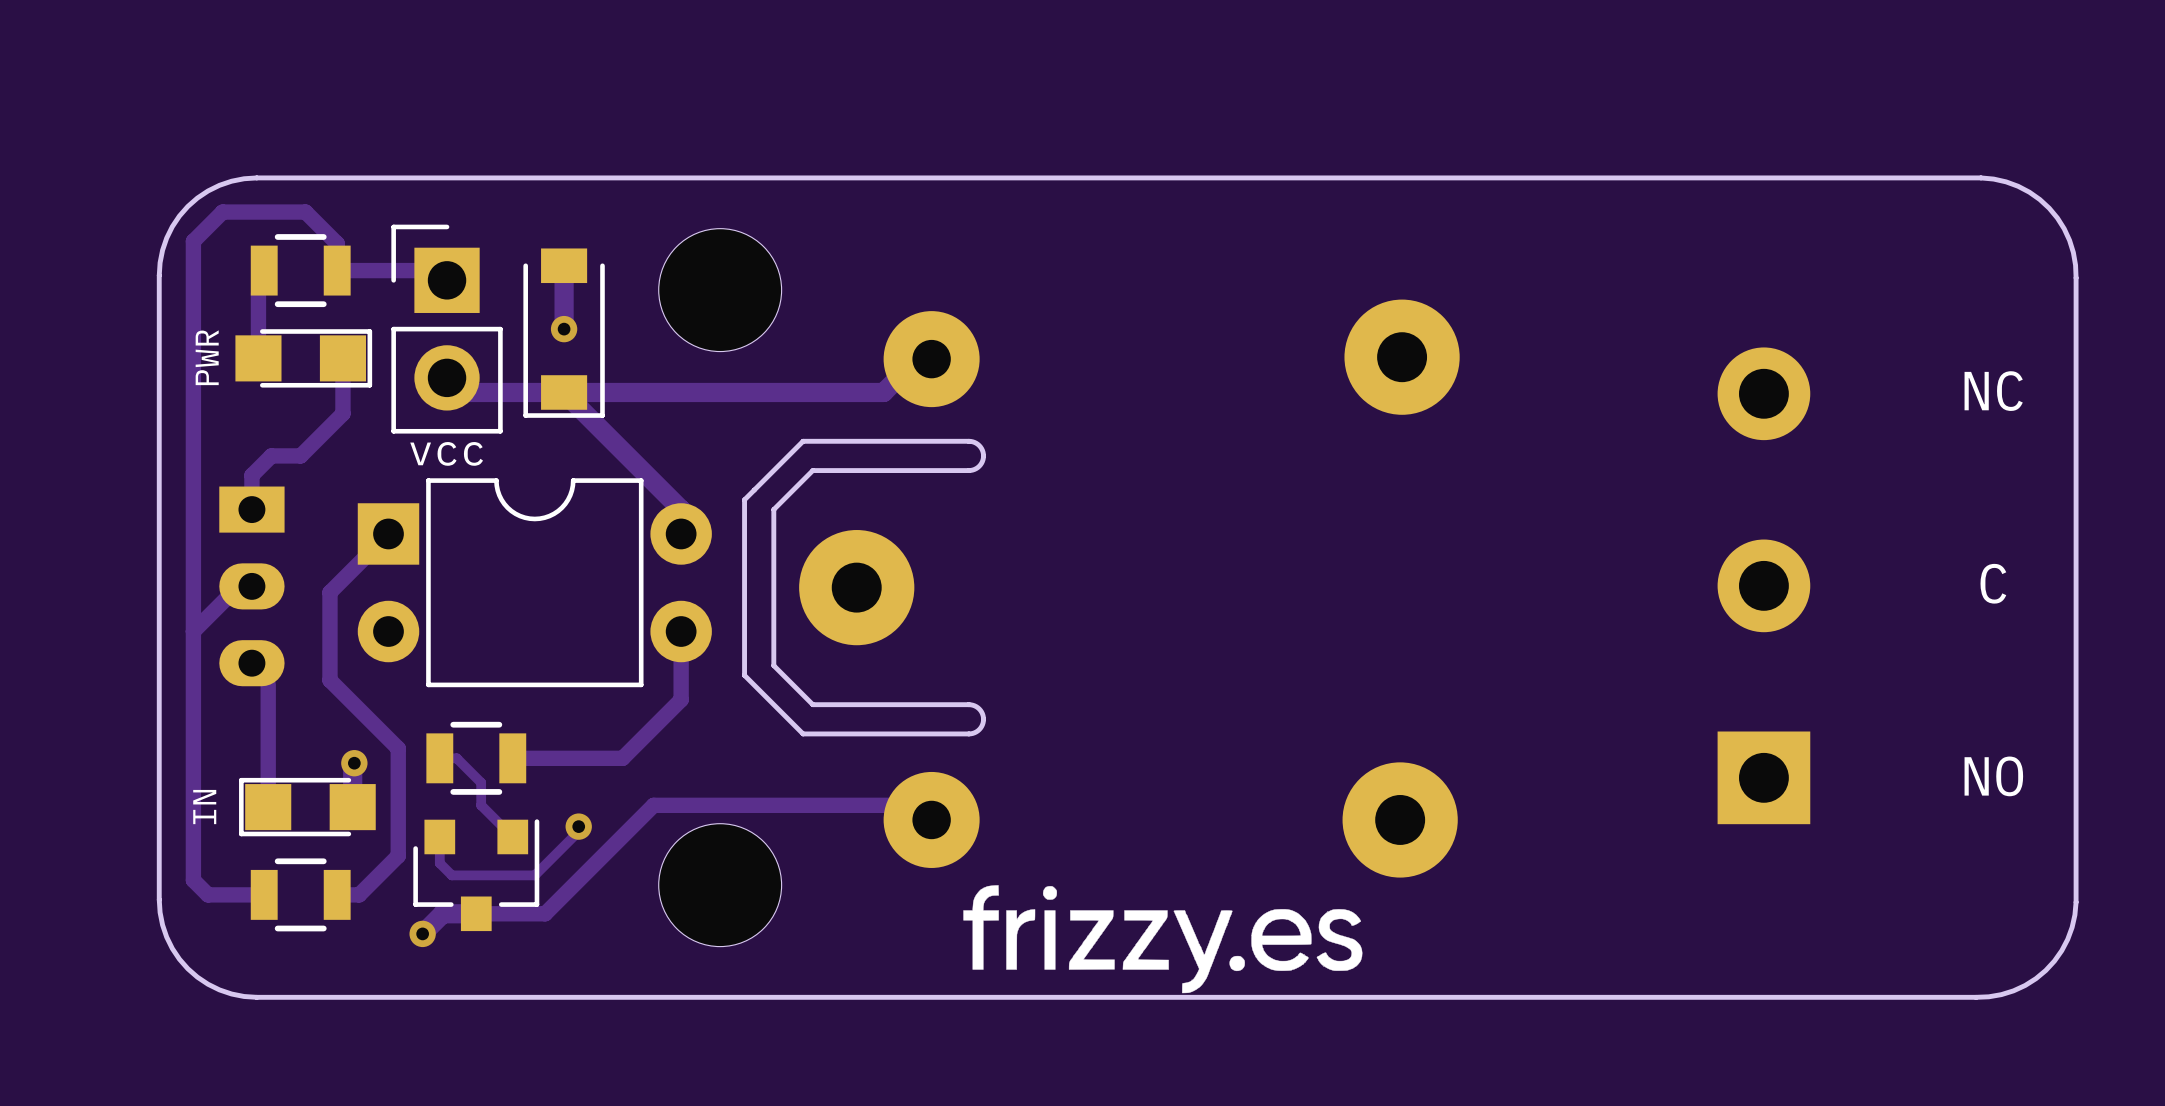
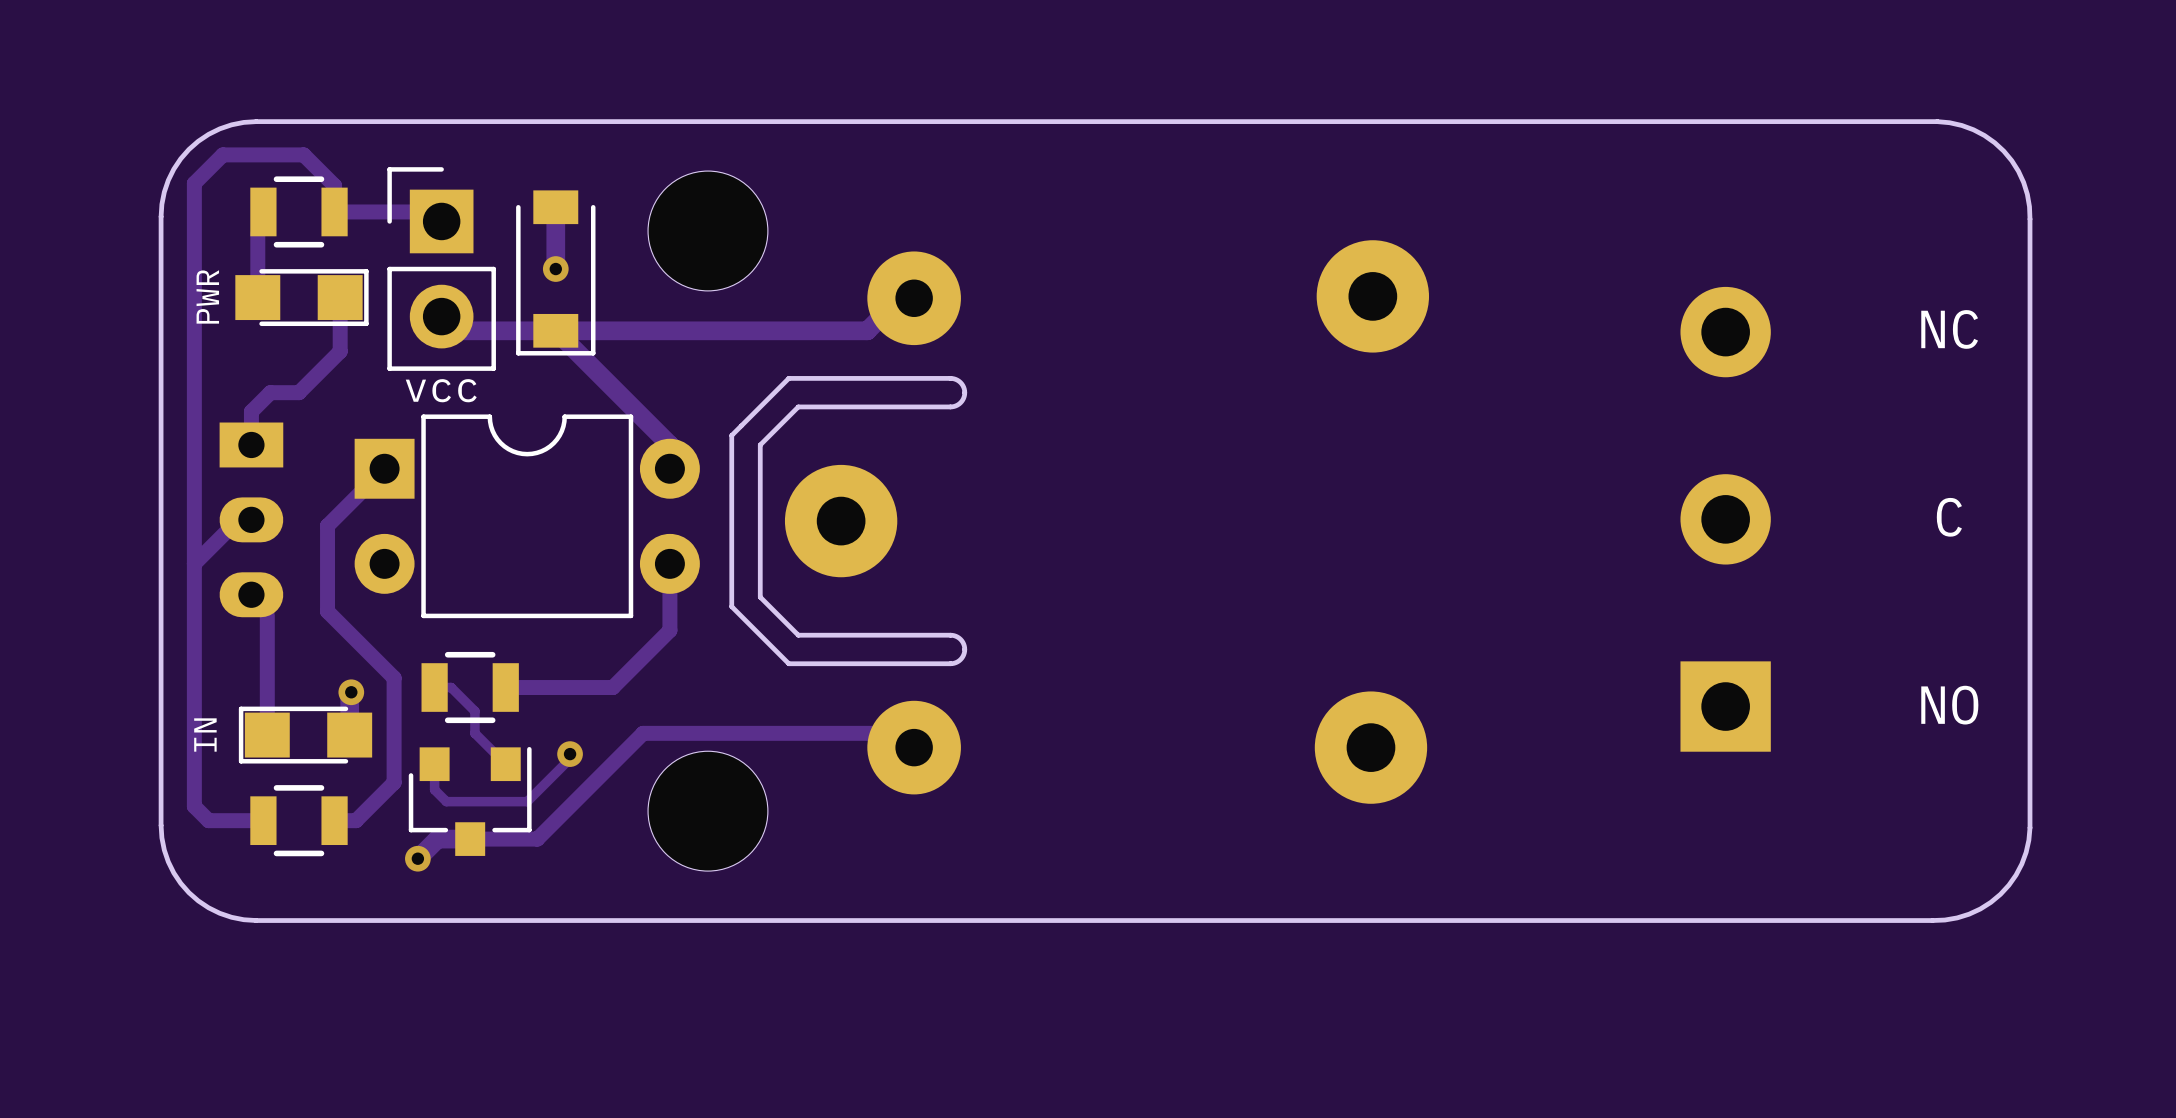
drawing: [963, 885, 1363, 994] -> none

